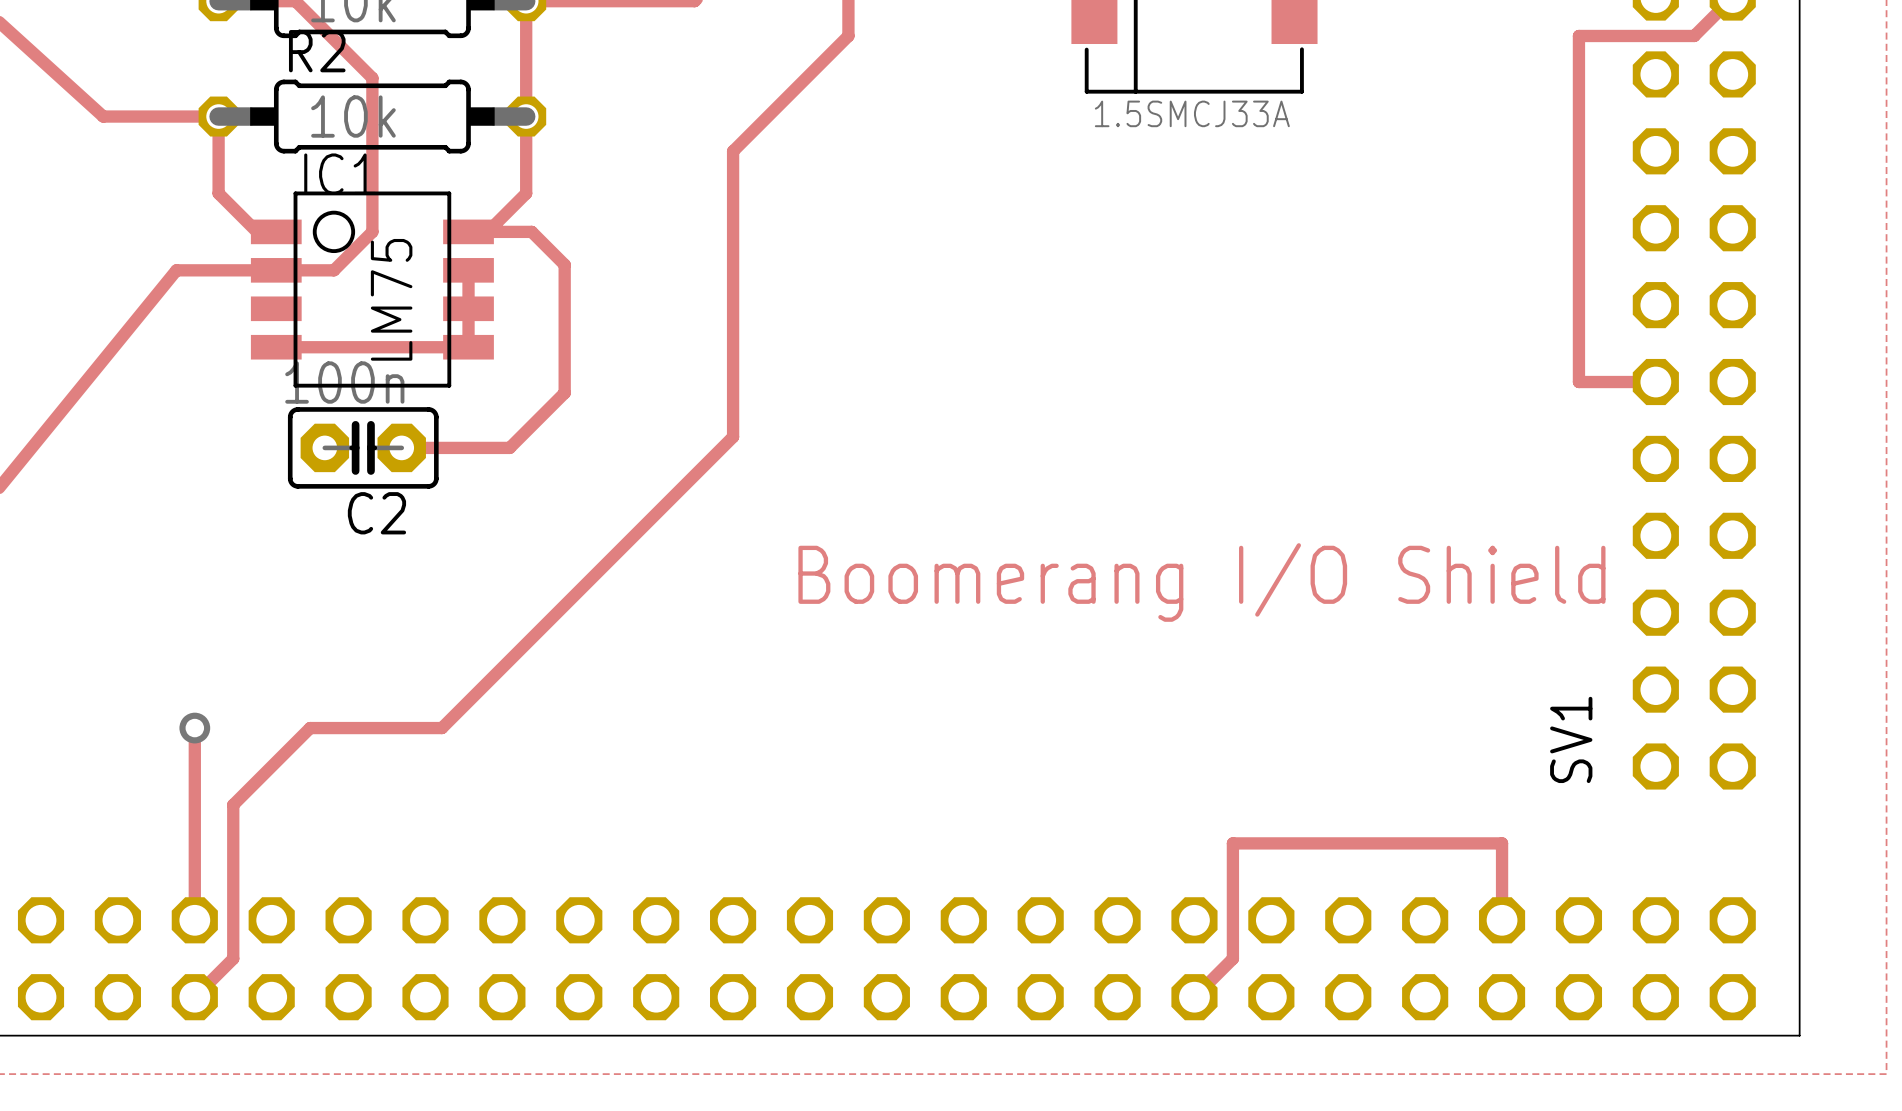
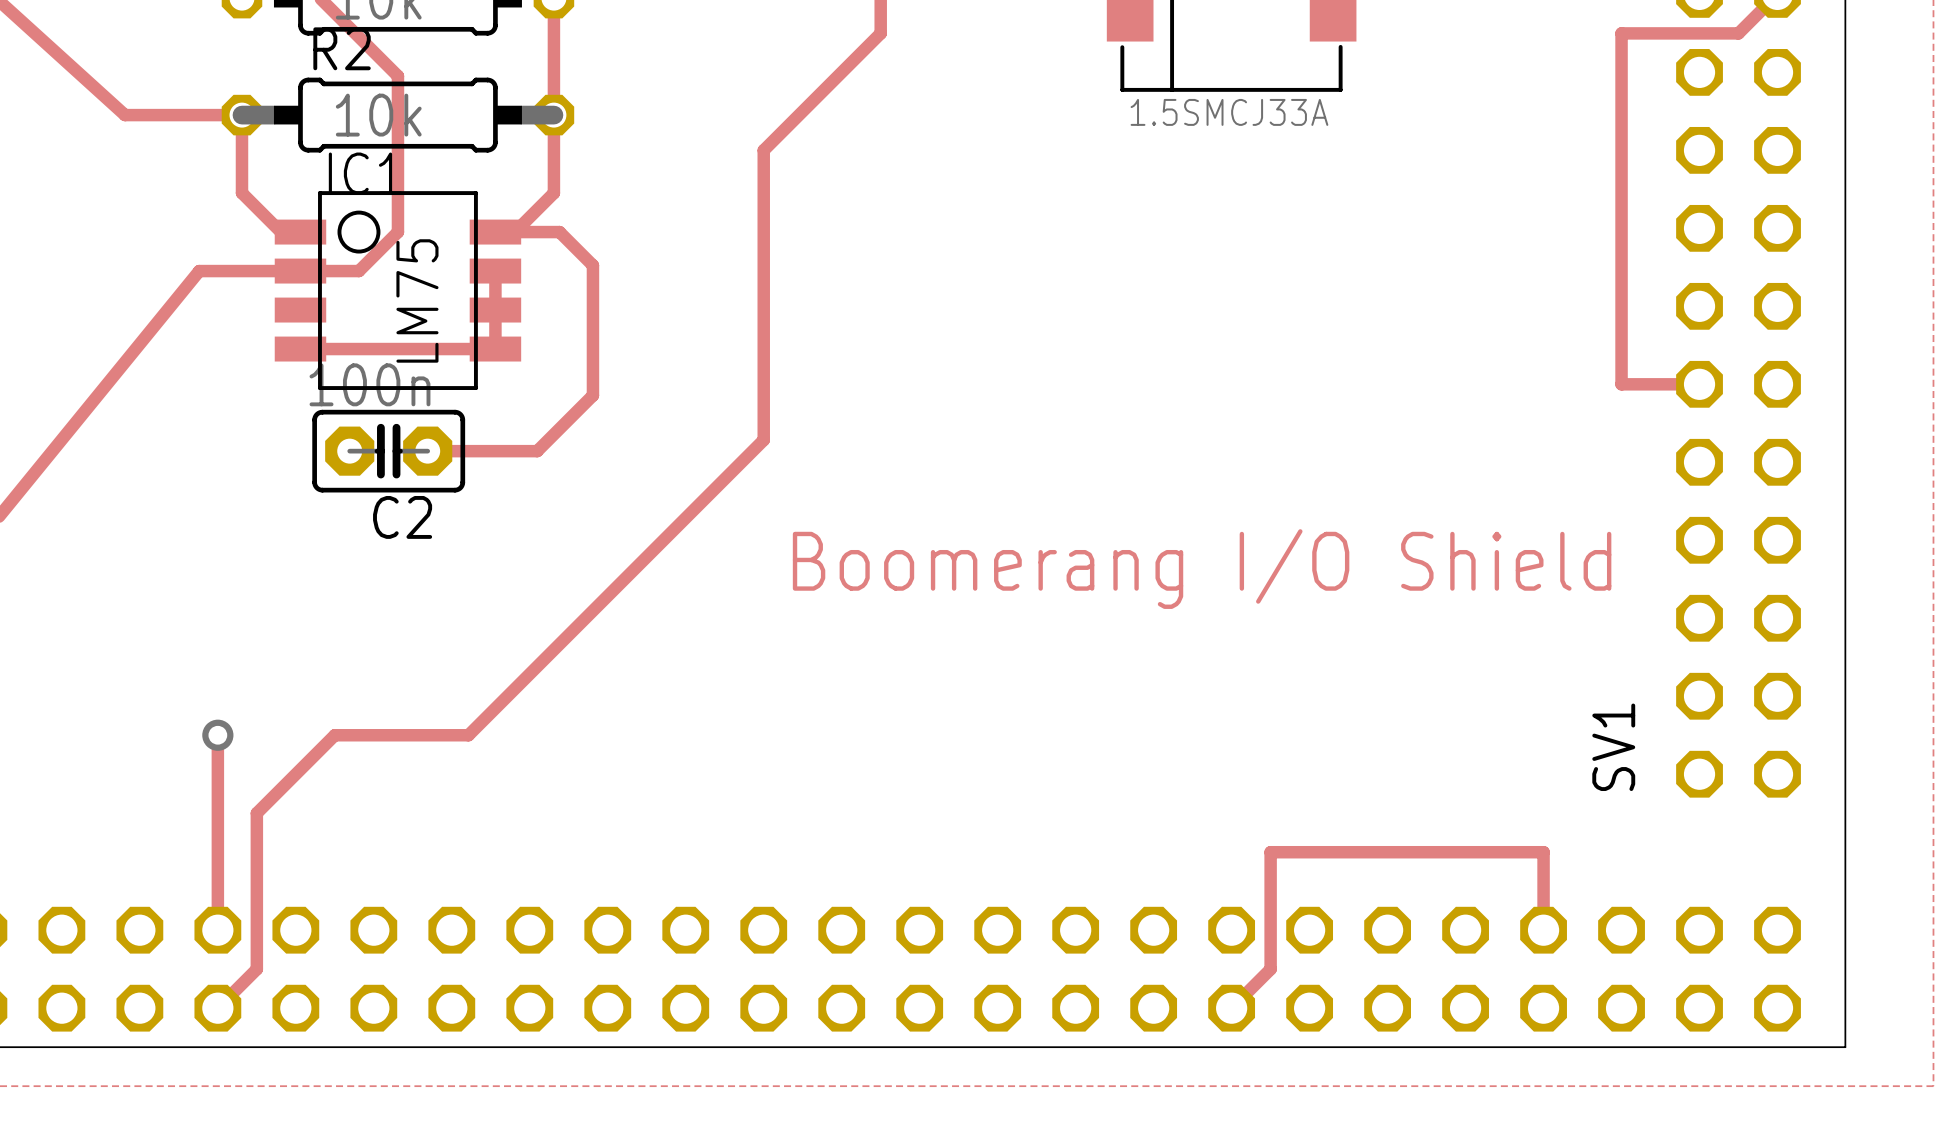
text position: Boomerang I/O Shield (1201, 582) -> Boomerang I/O Shield (1202, 569)

